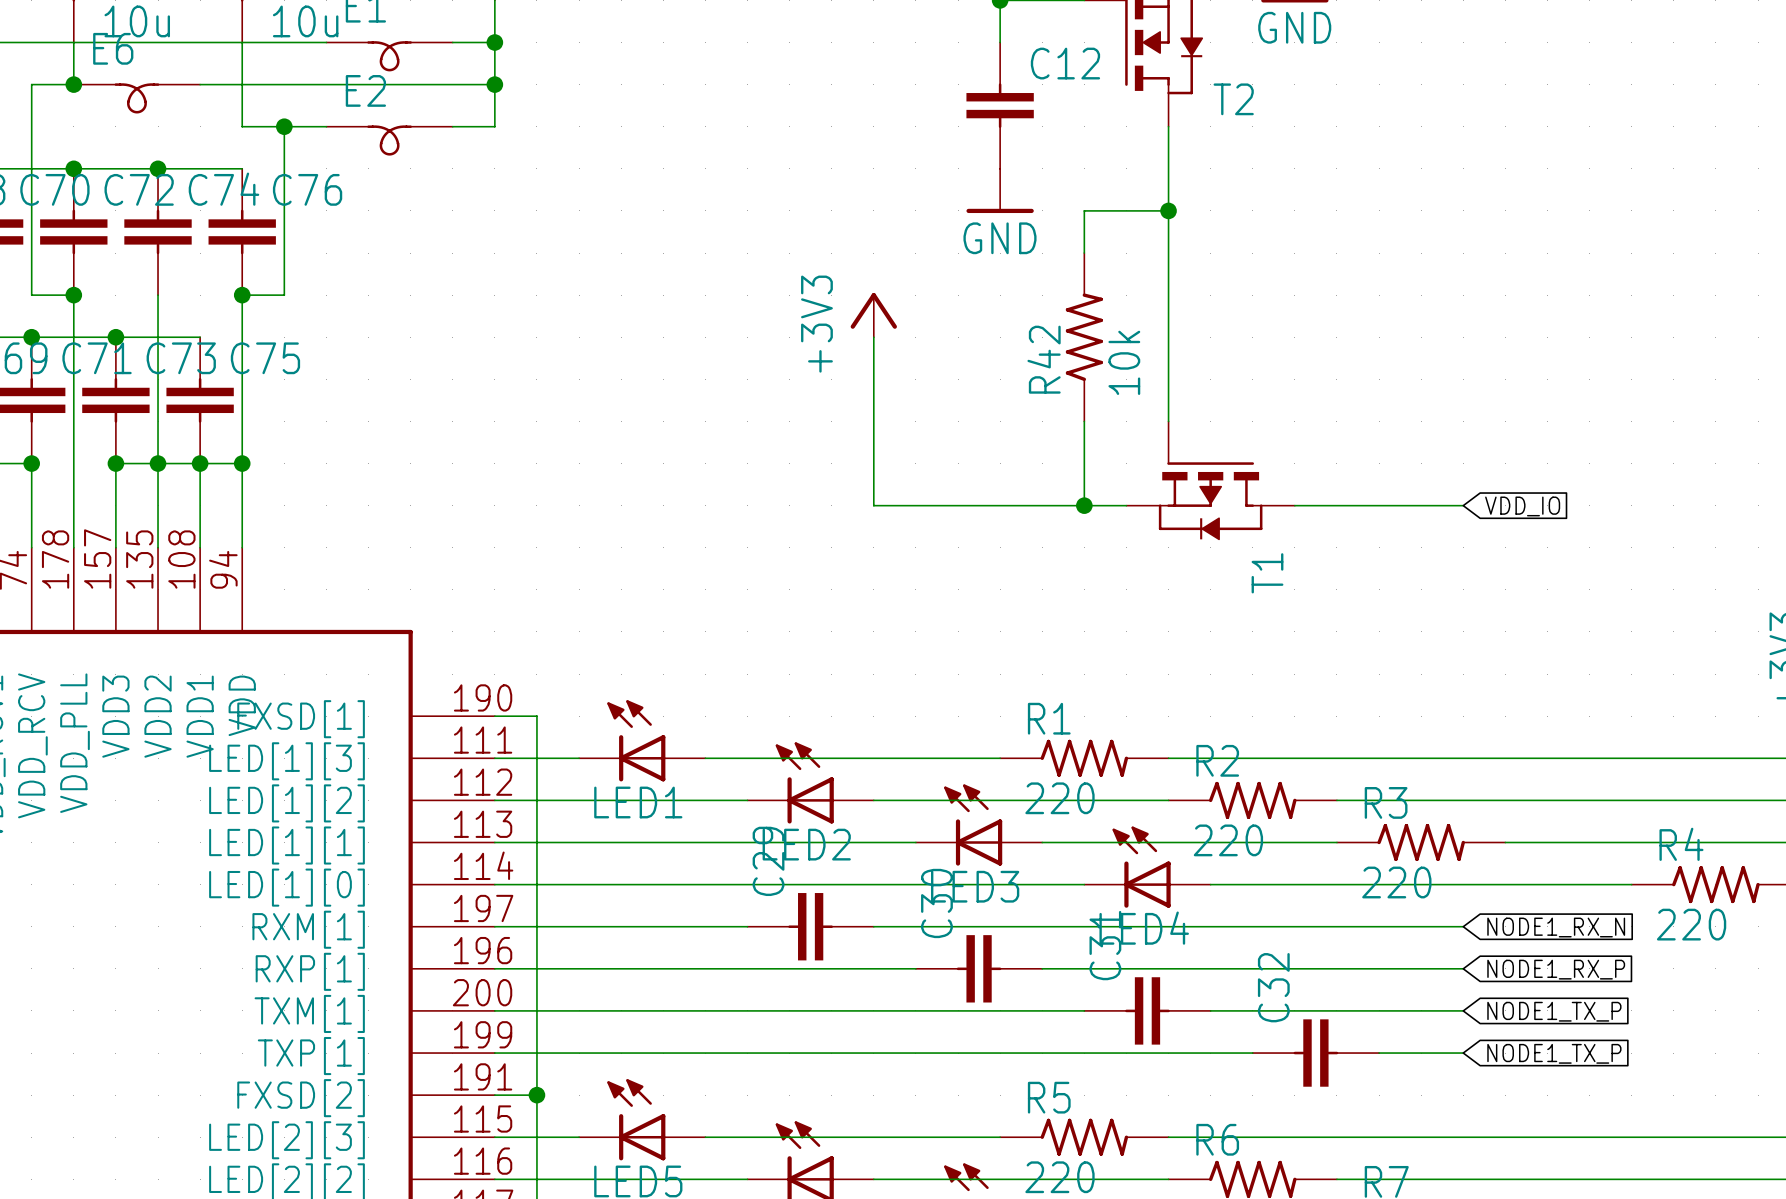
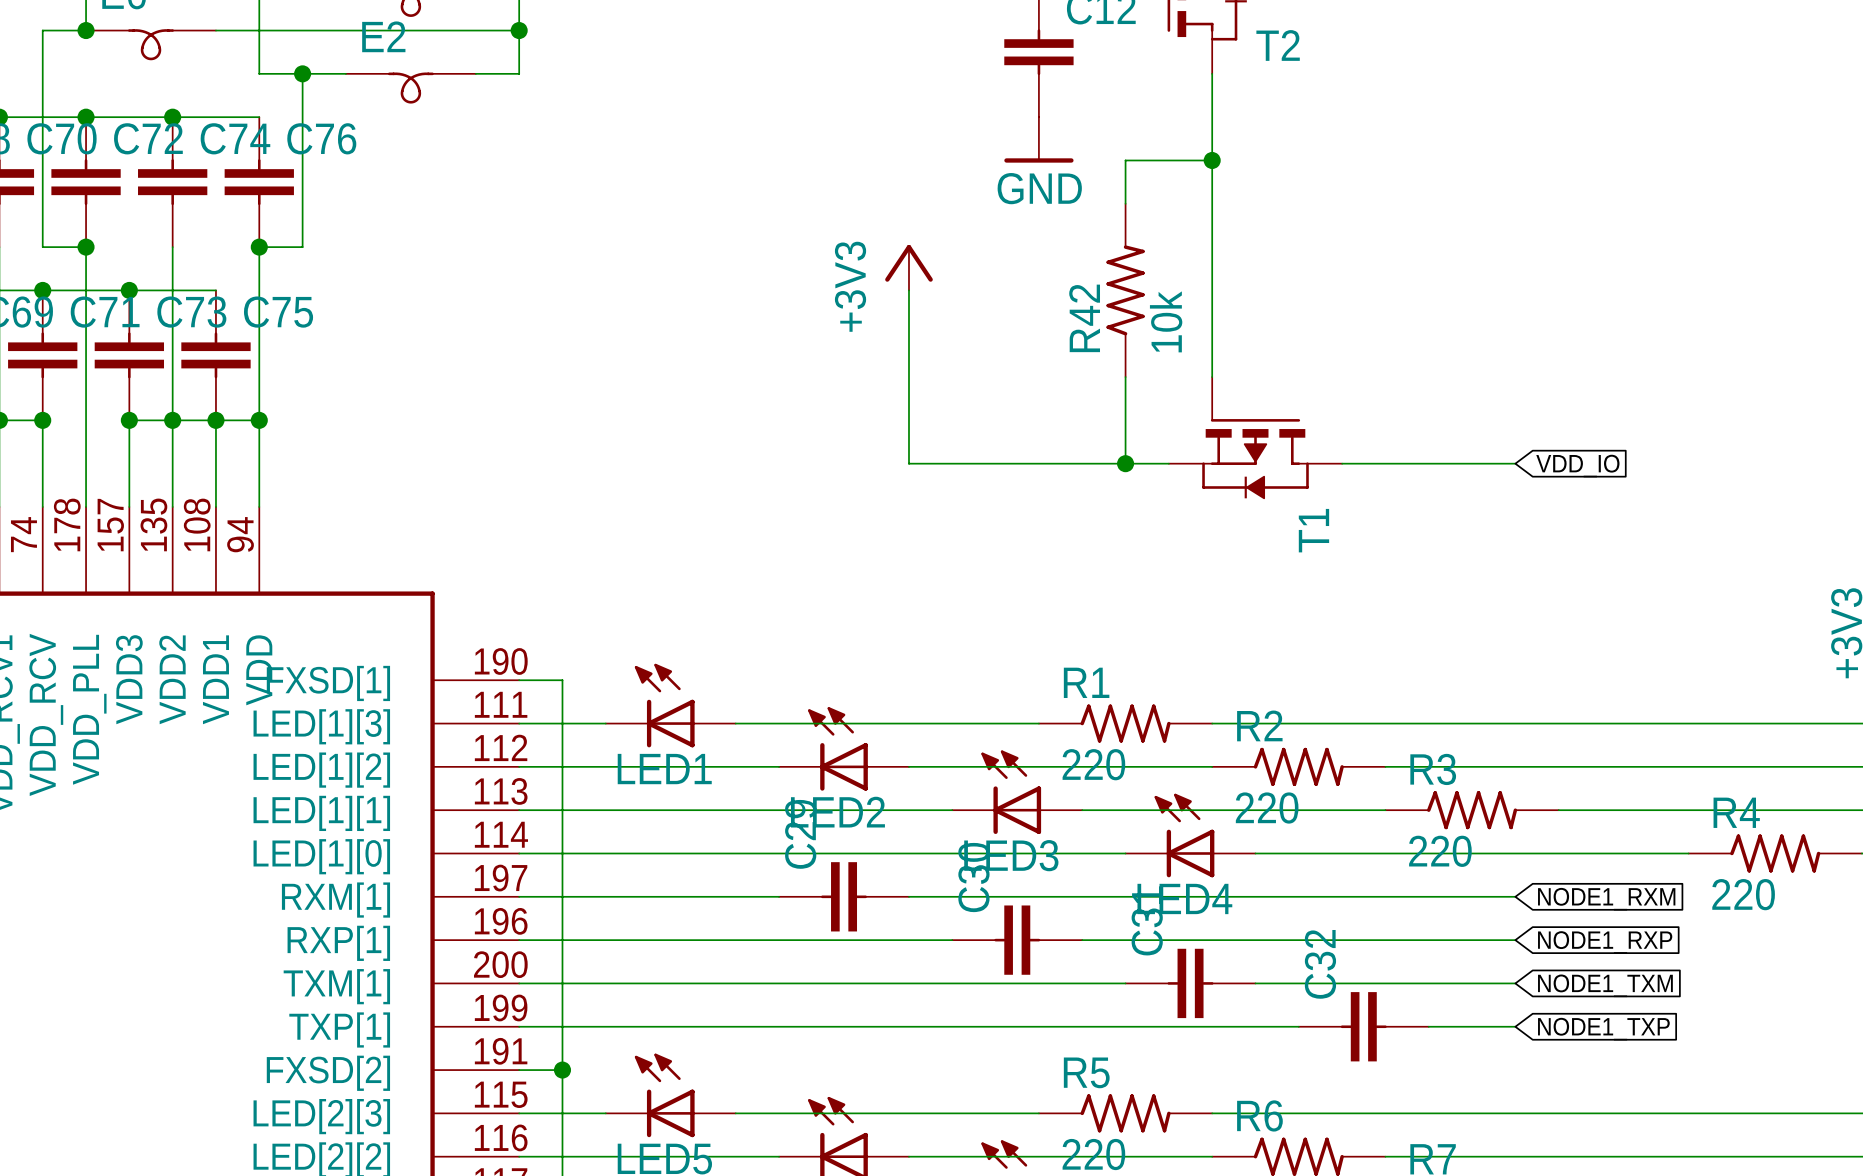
global label: NODE1_RX_N (1556, 927) -> NODE1_RXM (1606, 899)
global label: NODE1_RX_P (1556, 969) -> NODE1_RXP (1605, 942)
global label: NODE1_TX_P (1554, 1011) -> NODE1_TXM (1605, 985)
global label: NODE1_TX_P (1554, 1053) -> NODE1_TXP (1603, 1029)

